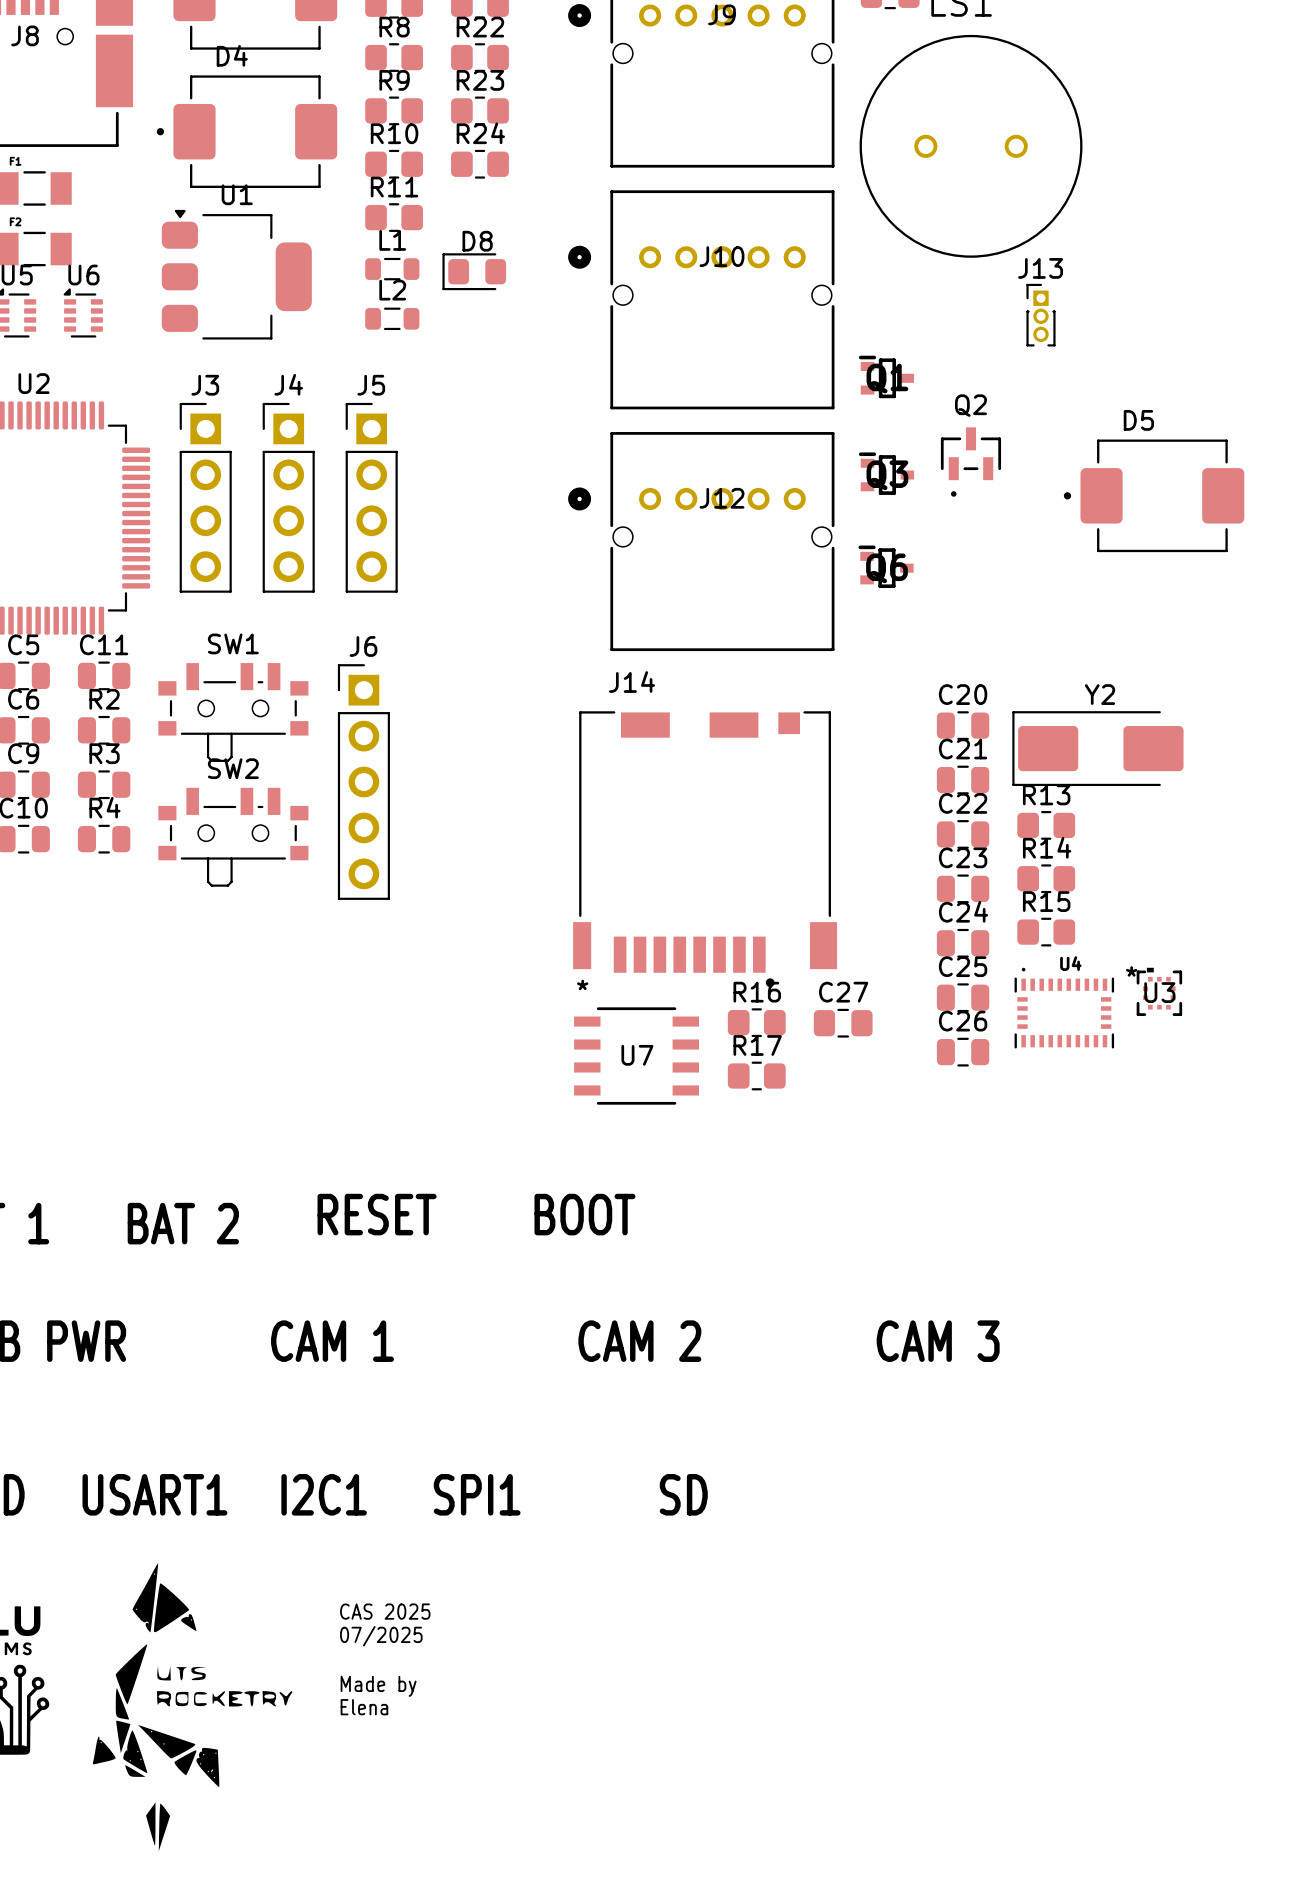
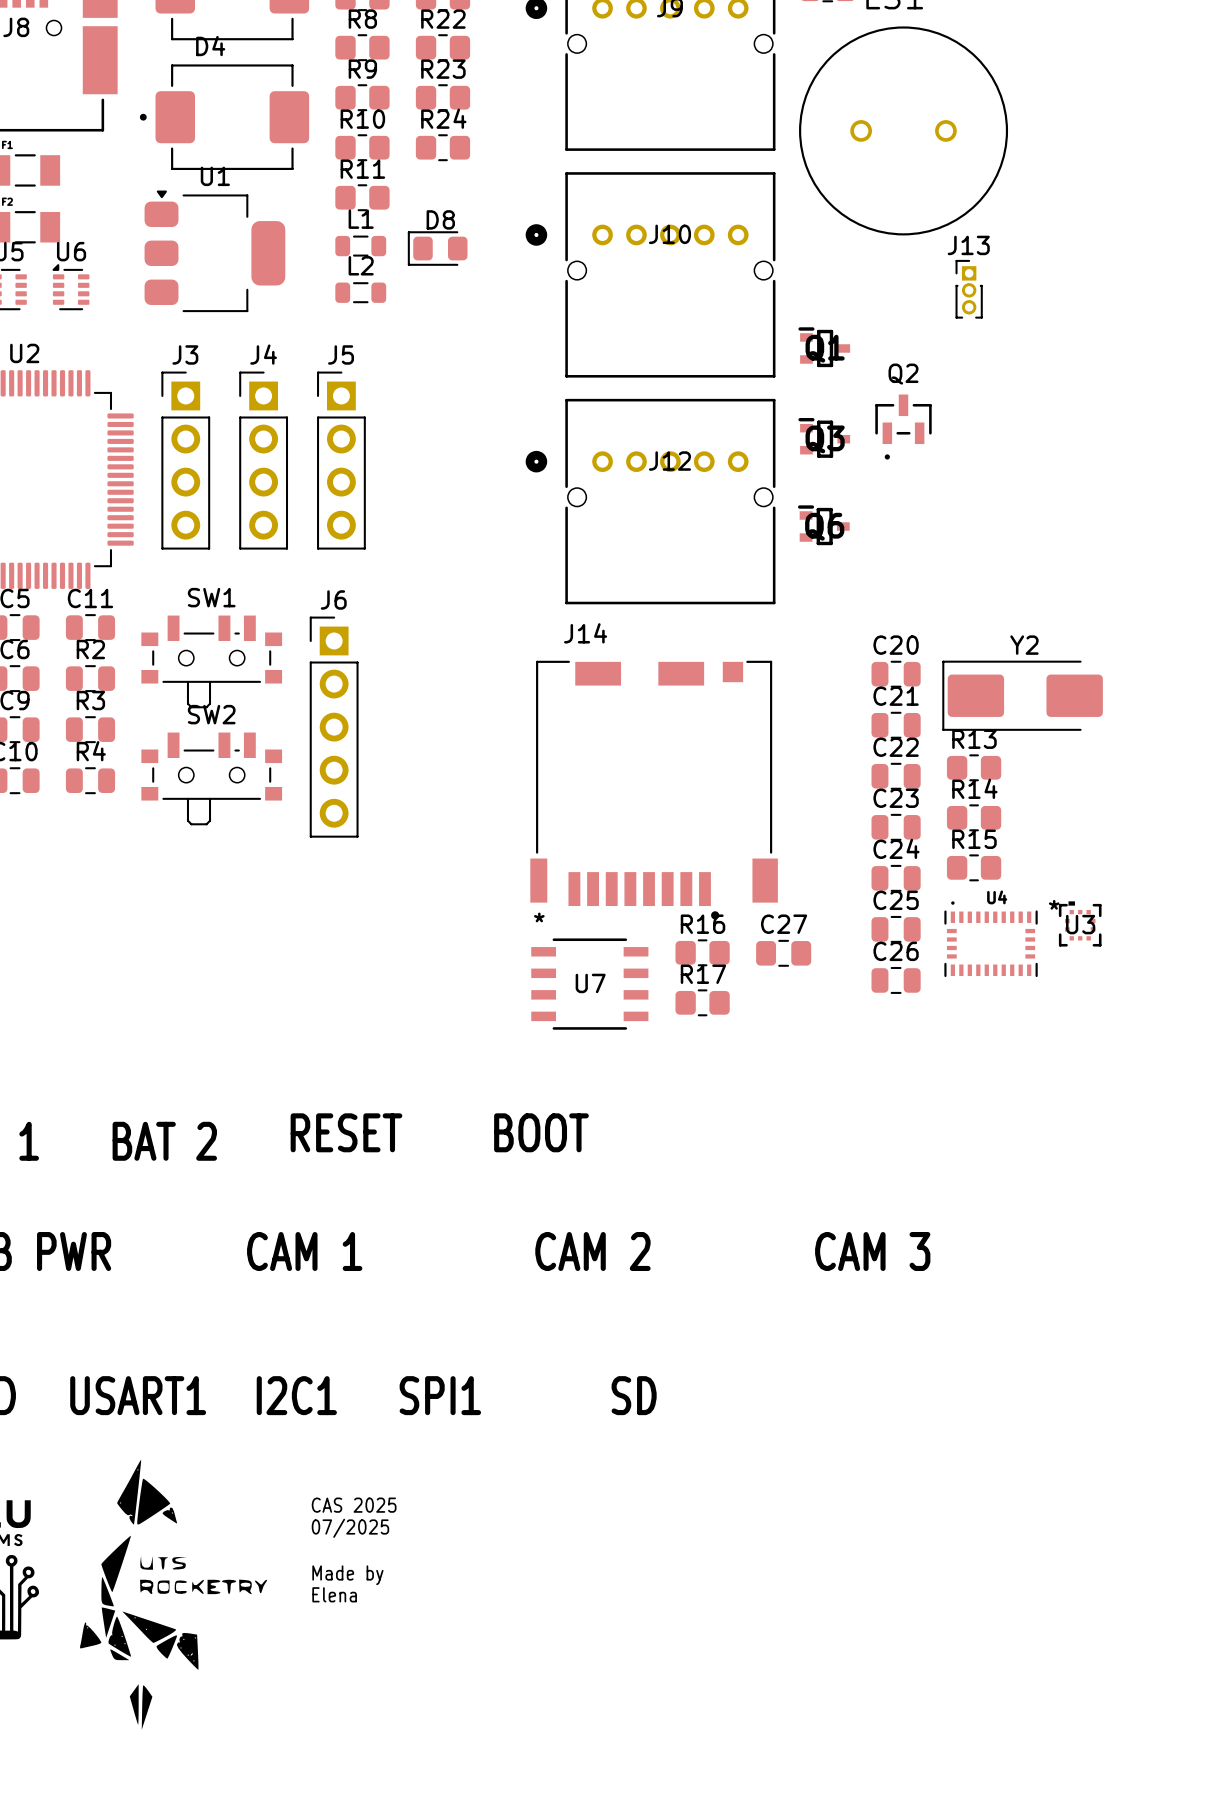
D5: (1154, 495) -> none

